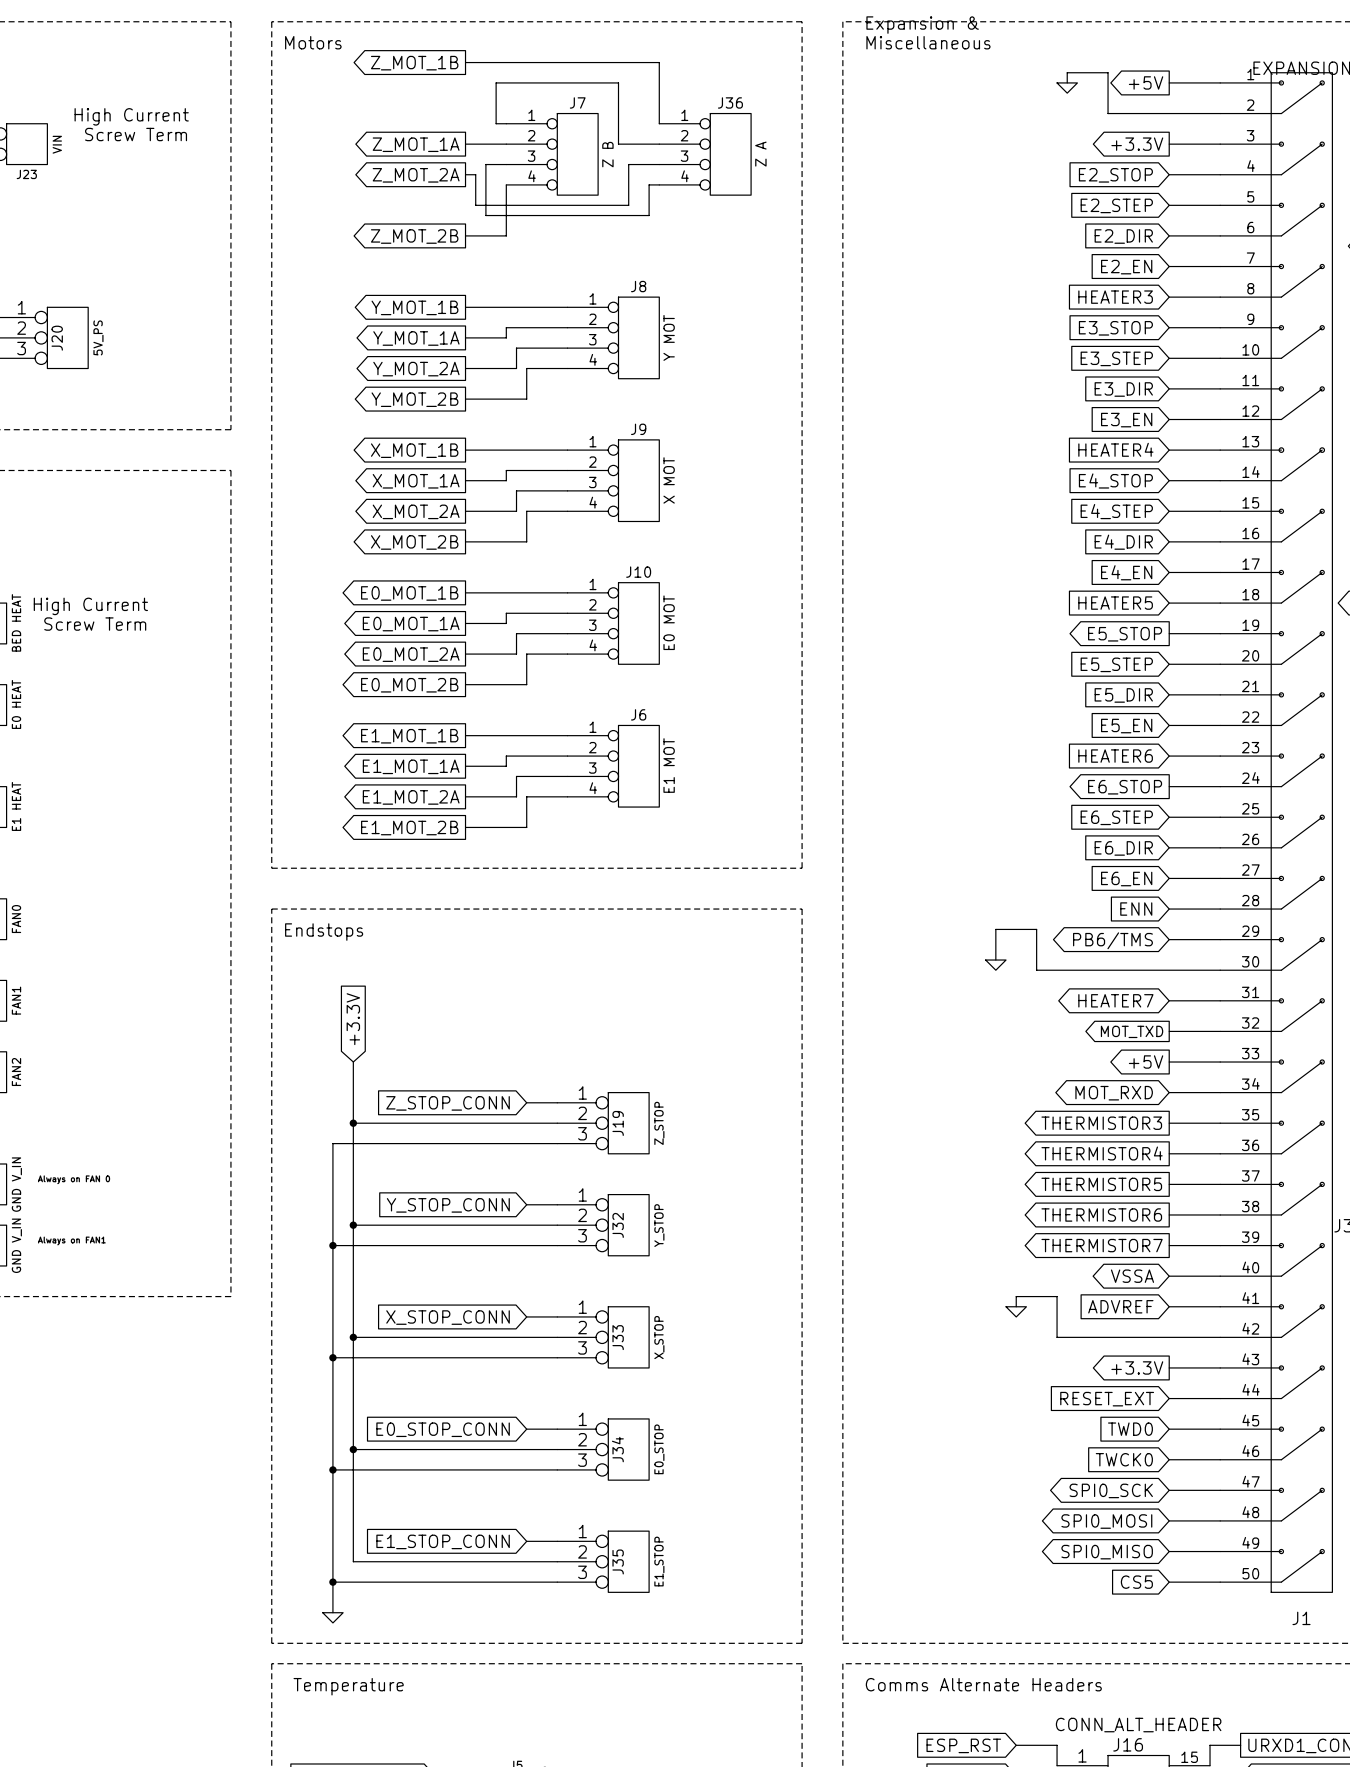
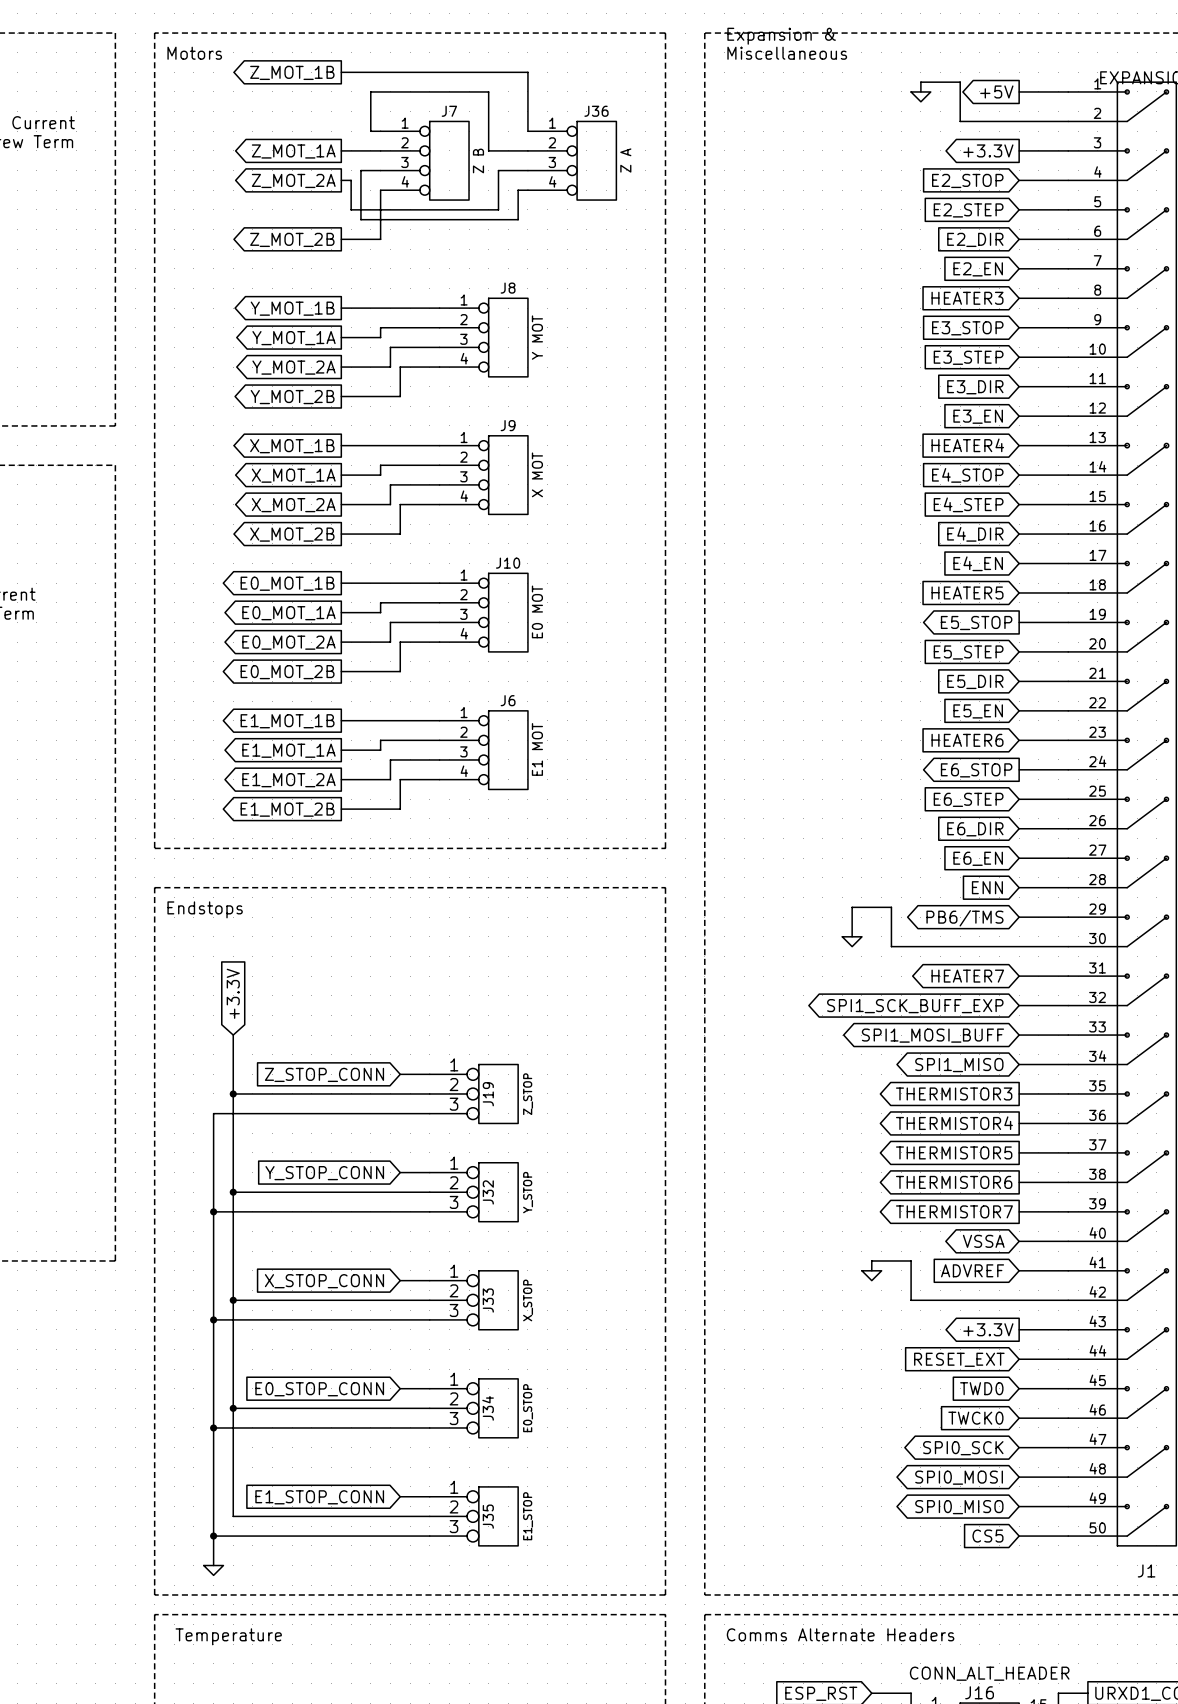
global label shape: output (1132, 1031) -> bidirectional (915, 1006)
global label: MOT_TXD (1132, 1031) -> SPI1_SCK_BUFF_EXP (915, 1006)
global label shape: output (1146, 1062) -> bidirectional (932, 1035)
global label: +5V (1146, 1062) -> SPI1_MOSI_BUFF (932, 1035)
global label: MOT_RXD (1114, 1093) -> SPI1_MISO (959, 1065)

